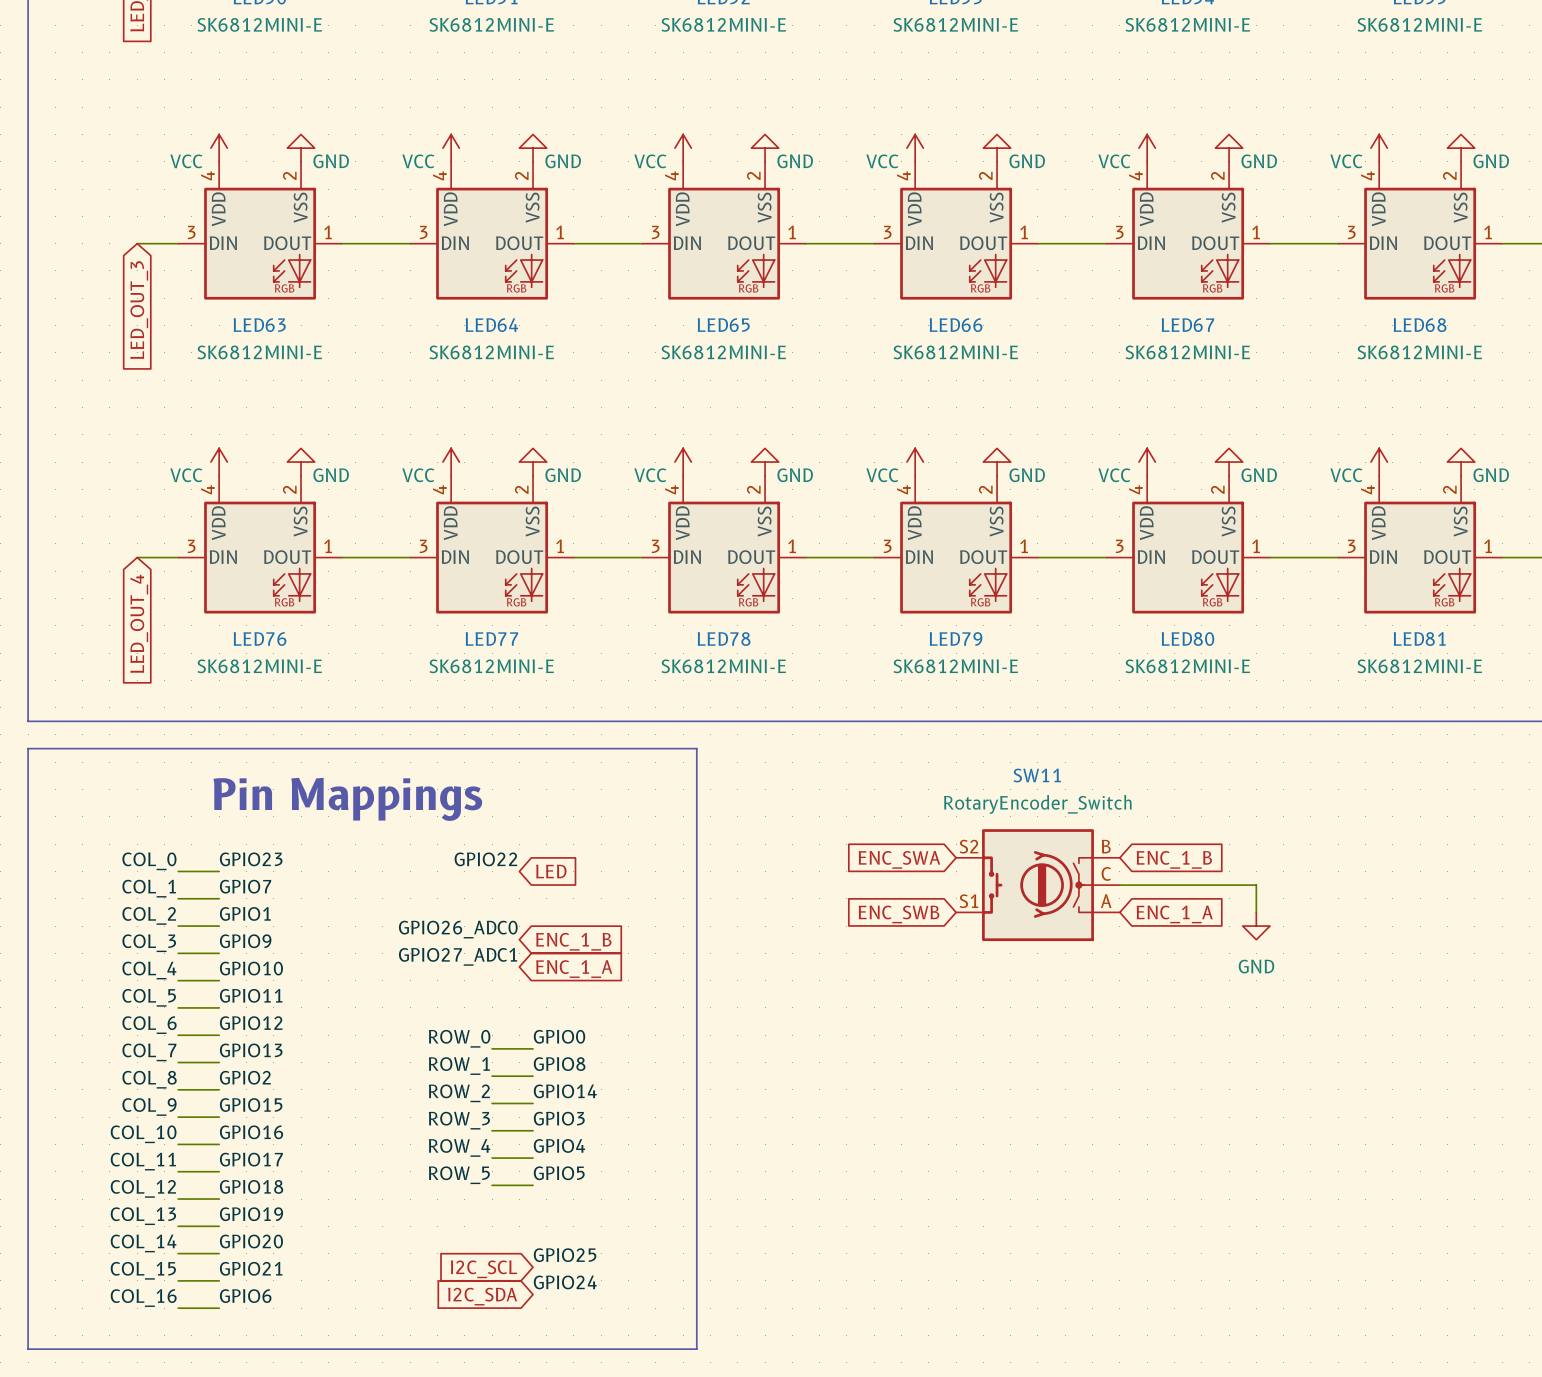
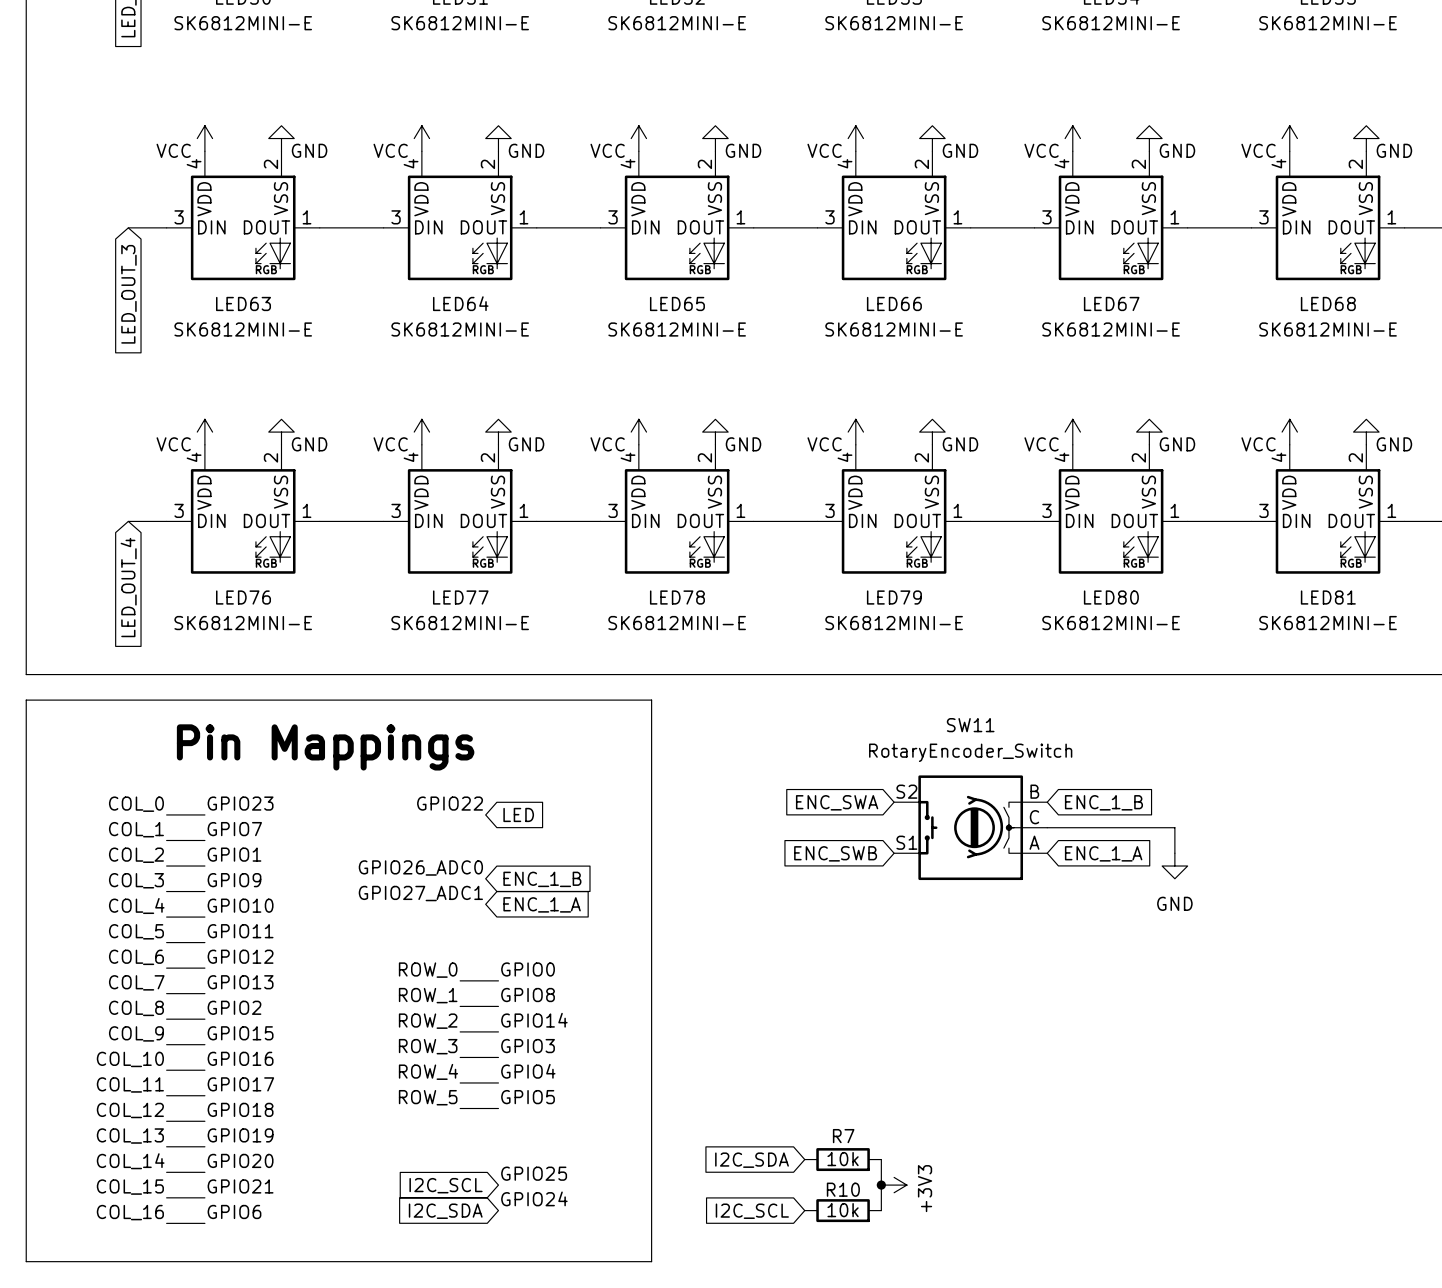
R7: none -> 10k (843, 1159)
wire: none -> (881, 1159) (881, 1210)
global label: none -> I2C_SDA (752, 1160)
junction: none -> (881, 1185)
power symbol: none -> +3V3 (894, 1185)
R10: none -> 10k (843, 1210)
global label: none -> I2C_SCL (752, 1211)

